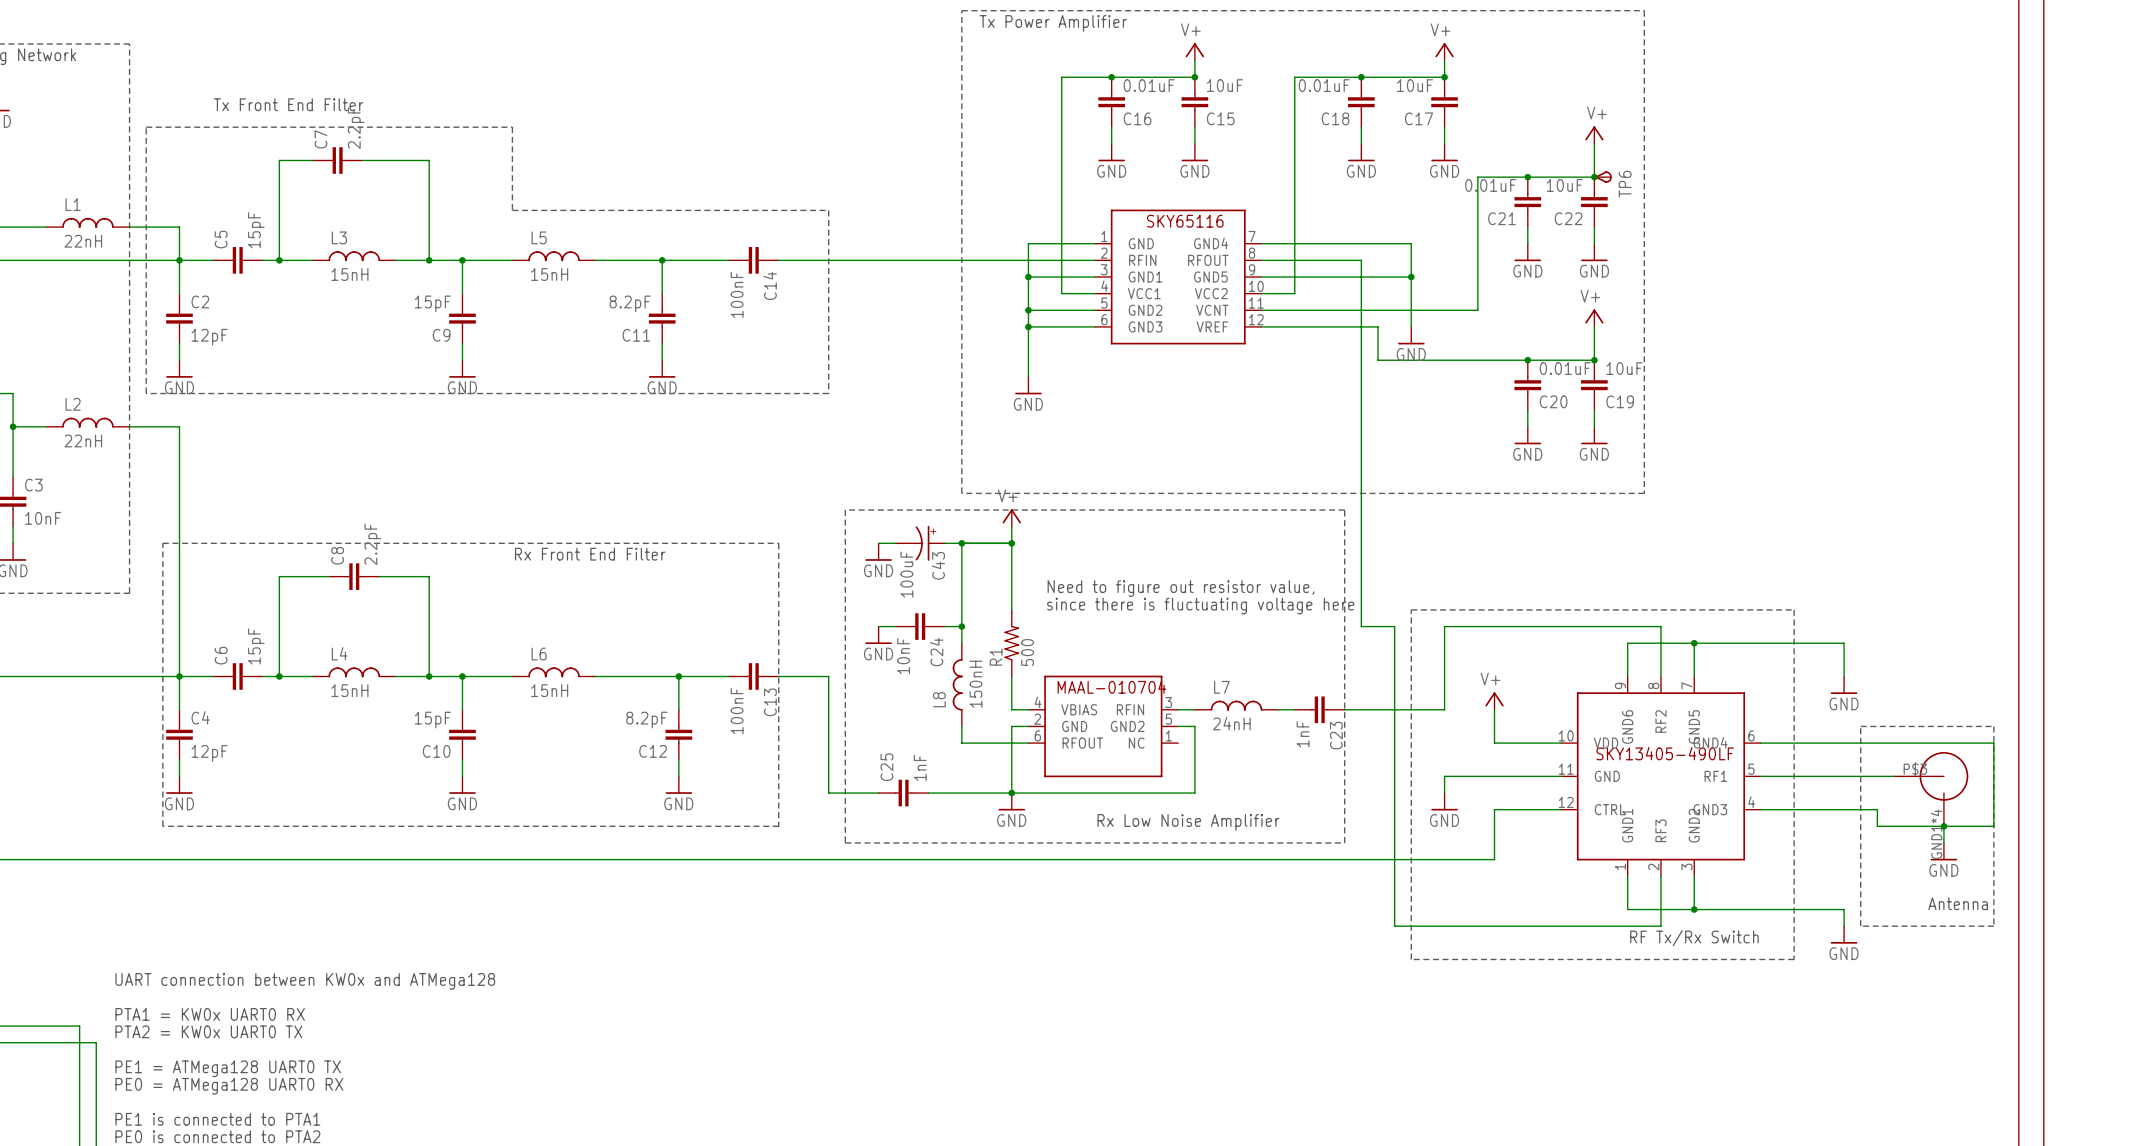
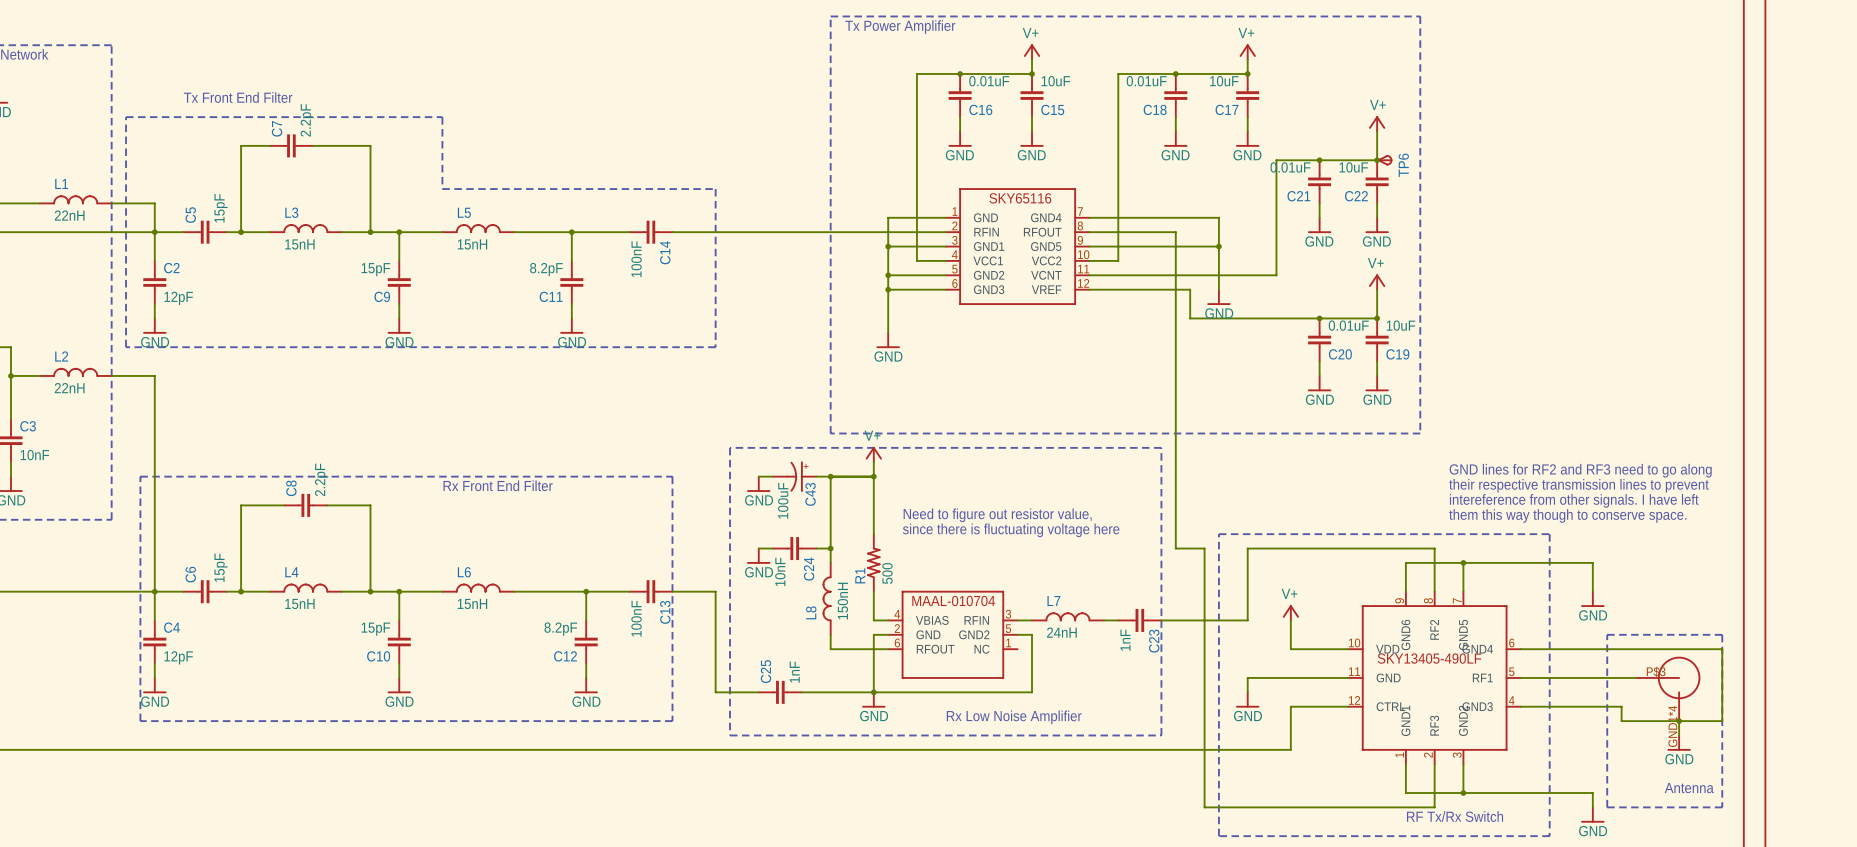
text: none -> GND lines for RF2 and RF3 need to go along (1580, 470)
text: none -> their respective transmission lines to prevent (1579, 485)
text: none -> intereference from other signals. I have left (1574, 500)
text: none -> them this way though to conserve space. (1567, 515)

